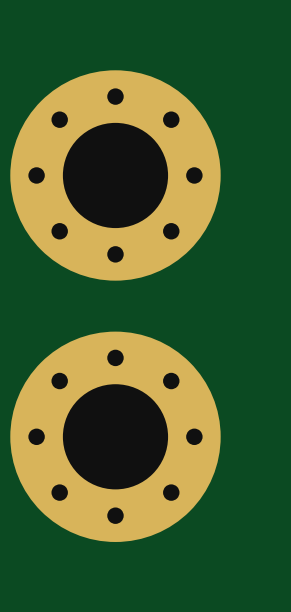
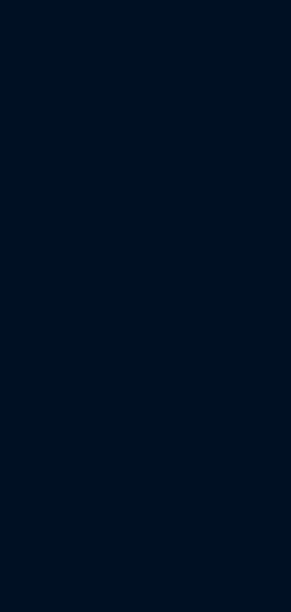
part: (115, 175) -> none
part: (115, 436) -> none

